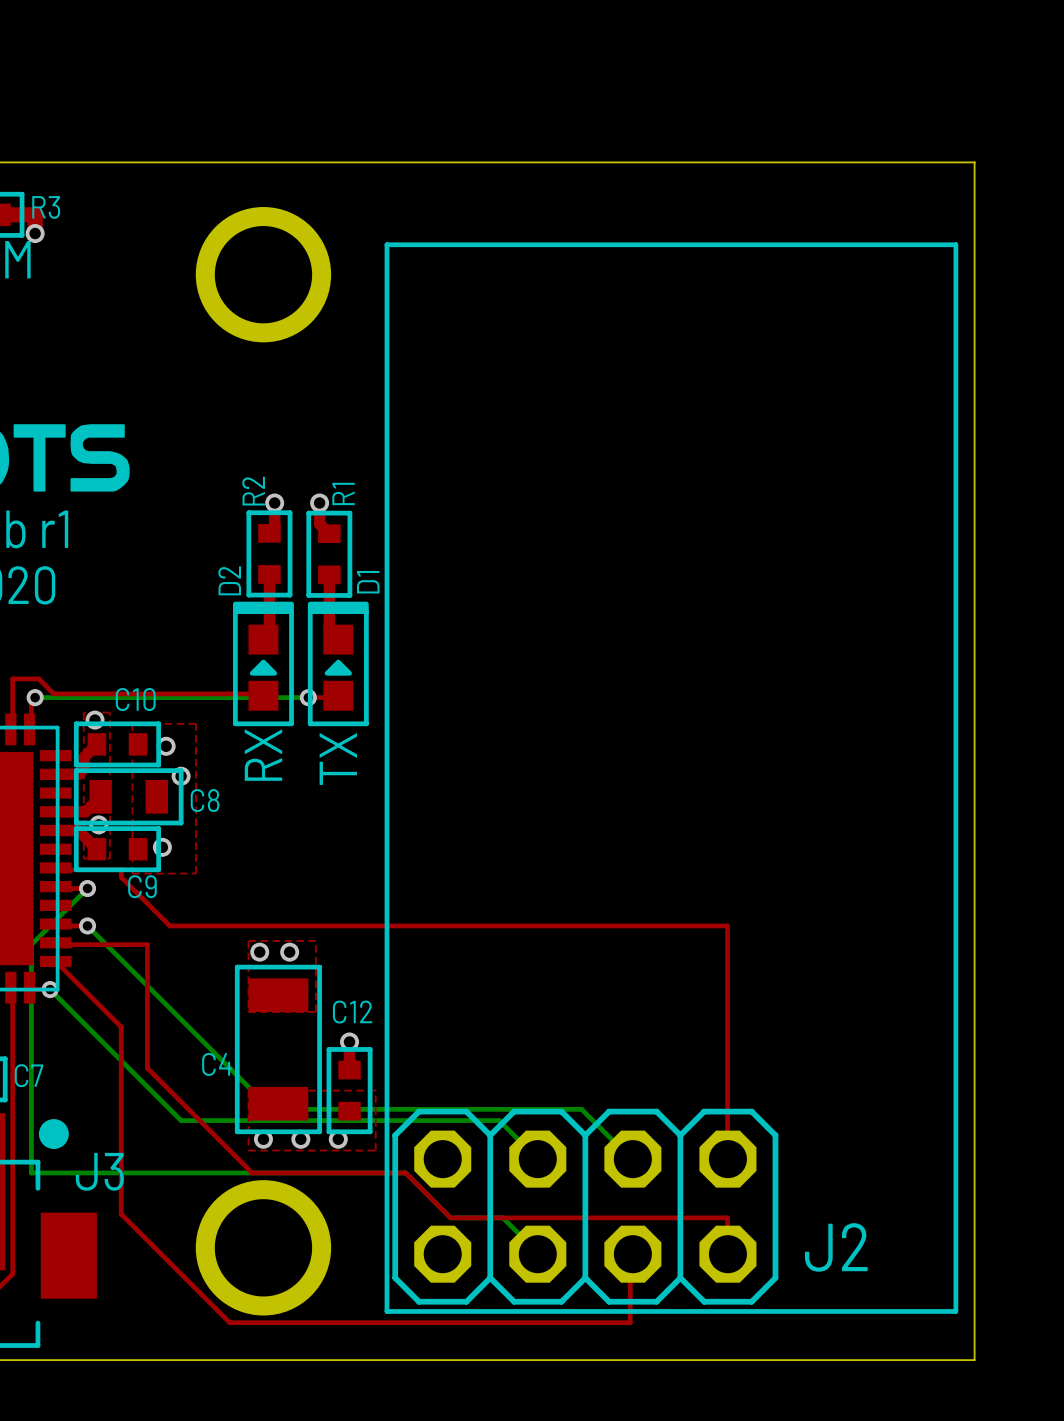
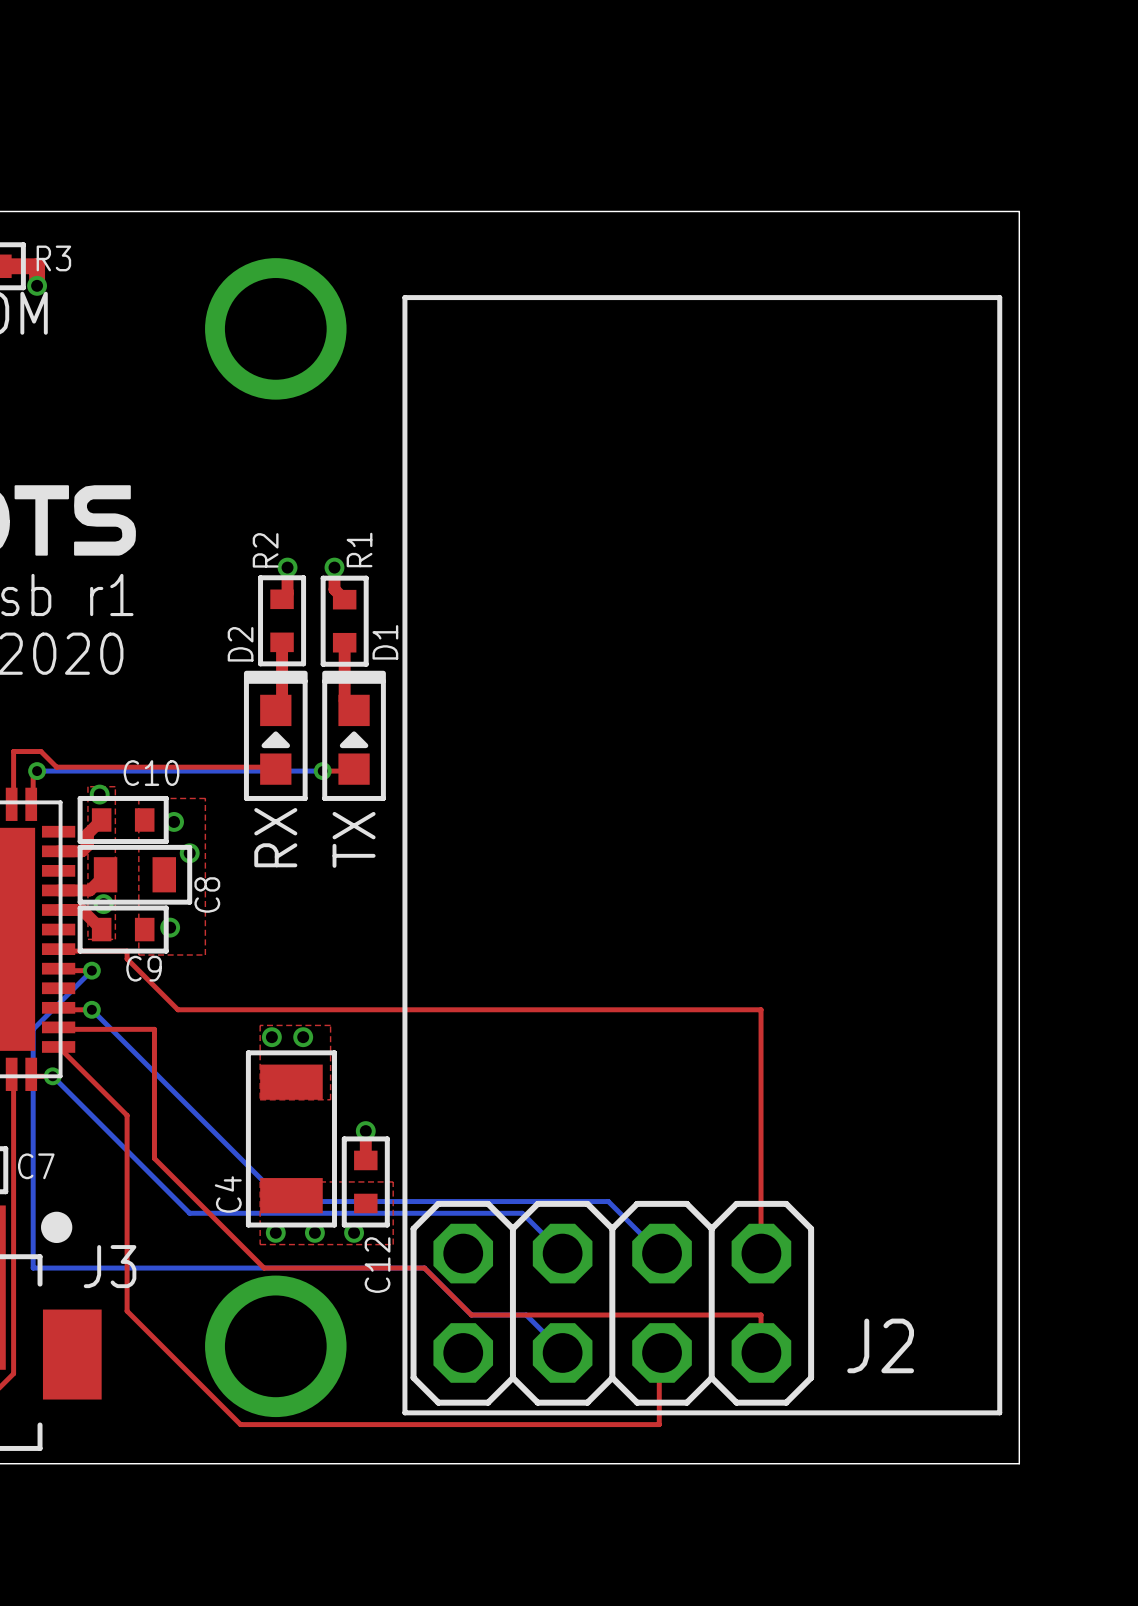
C8 name rotation: 0° (205, 800) -> 90° counterclockwise (207, 894)
C12 name rotation: 0° (352, 1012) -> 90° counterclockwise (377, 1265)
C12 name position: C12 (352, 1012) -> C12 (377, 1265)
C4 name rotation: 0° (216, 1064) -> 90° counterclockwise (228, 1194)

